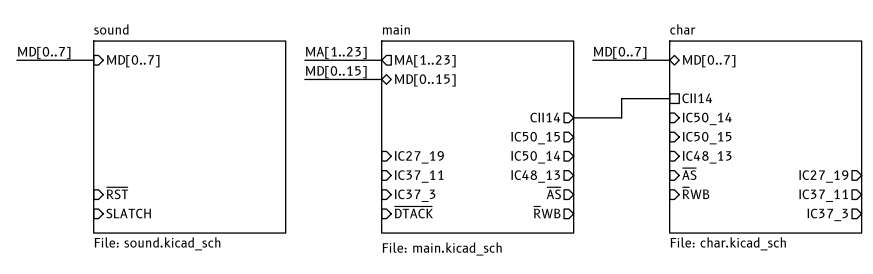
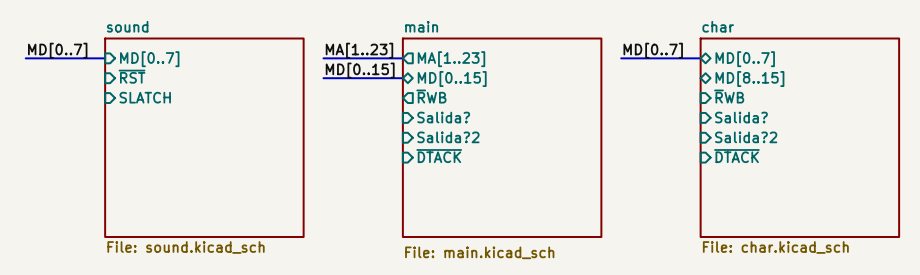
sheet pin: none -> MD[8..15] (749, 79)
sheet pin: none -> ~{R}WB (431, 96)
wire: (669, 98) (621, 98) (621, 117) (573, 117) -> none
sheet pin shape: passive (697, 98) -> input (729, 96)
sheet pin: CII14 (697, 98) -> ~{R}WB (729, 96)
sheet pin: none -> Salida? (443, 117)
sheet pin: CII14 (545, 117) -> none
sheet pin: IC50_14 (707, 118) -> Salida? (741, 117)
sheet pin: none -> Salida?2 (448, 137)
sheet pin: IC50_15 (535, 138) -> none
sheet pin: IC50_15 (707, 138) -> Salida?2 (746, 137)
sheet pin: IC27_19 (419, 157) -> ~{DTACK} (439, 156)
sheet pin: IC50_14 (535, 157) -> none
sheet pin: IC48_13 (707, 157) -> ~{DTACK} (736, 156)
sheet pin: ~{AS} (689, 174) -> none
sheet pin: IC37_11 (419, 176) -> none
sheet pin: IC48_13 (535, 176) -> none
sheet pin: IC27_19 (823, 176) -> none
sheet pin position: ~{RST} (117, 193) -> ~{RST} (132, 76)
sheet pin: ~{AS} (553, 193) -> none
sheet pin: ~{R}WB (696, 193) -> none
sheet pin: IC37_3 (415, 195) -> none
sheet pin: IC37_11 (823, 195) -> none
sheet pin: ~{DTACK} (413, 212) -> none
sheet pin: ~{R}WB (547, 212) -> none
sheet pin position: SLATCH (128, 213) -> SLATCH (145, 97)
sheet pin: IC37_3 (827, 214) -> none

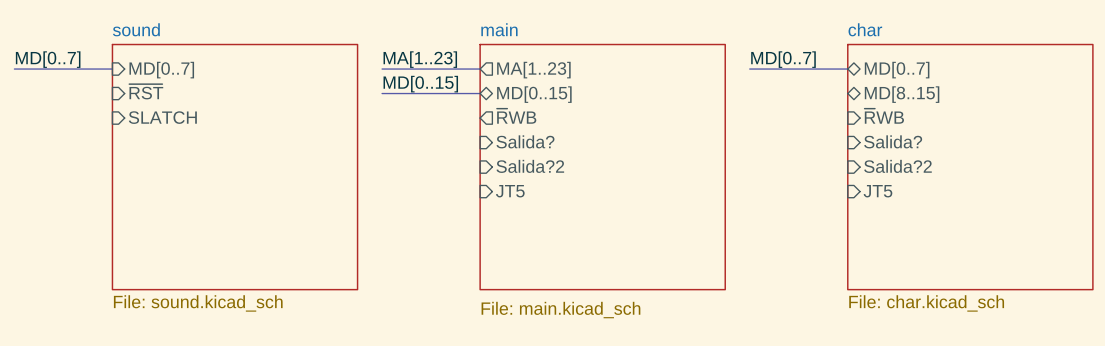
sheet pin: ~{DTACK} (439, 156) -> JT5 (510, 191)
sheet pin: ~{DTACK} (736, 156) -> JT5 (877, 191)

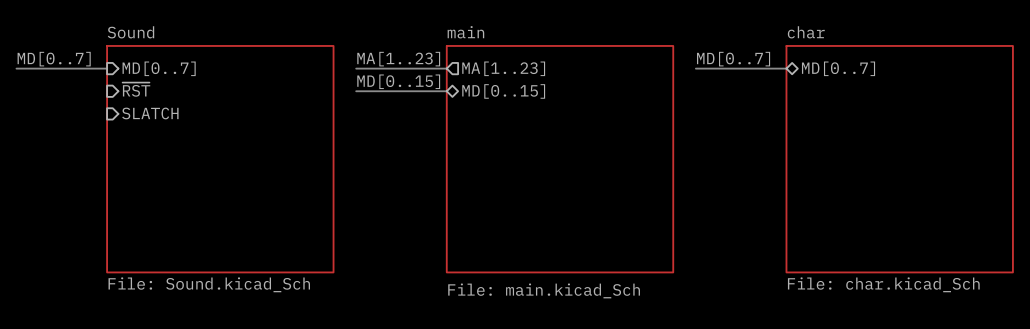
sheet sound name: sound (136, 29) -> Sound (131, 32)
sheet pin: MD[8..15] (902, 94) -> none
sheet pin: ~{R}WB (516, 116) -> none
sheet pin: ~{R}WB (884, 116) -> none
sheet pin: Salida? (525, 141) -> none
sheet pin: Salida? (893, 141) -> none
sheet pin: Salida?2 (530, 166) -> none
sheet pin: Salida?2 (897, 166) -> none
sheet pin: JT5 (510, 191) -> none
sheet pin: JT5 (877, 191) -> none
sheet sound value: File: sound.kicad_sch (198, 303) -> File: Sound.kicad_Sch (209, 284)
sheet char value: File: char.kicad_sch (926, 303) -> File: char.kicad_Sch (883, 284)
sheet main value: File: main.kicad_sch (560, 310) -> File: main.kicad_Sch (544, 290)

